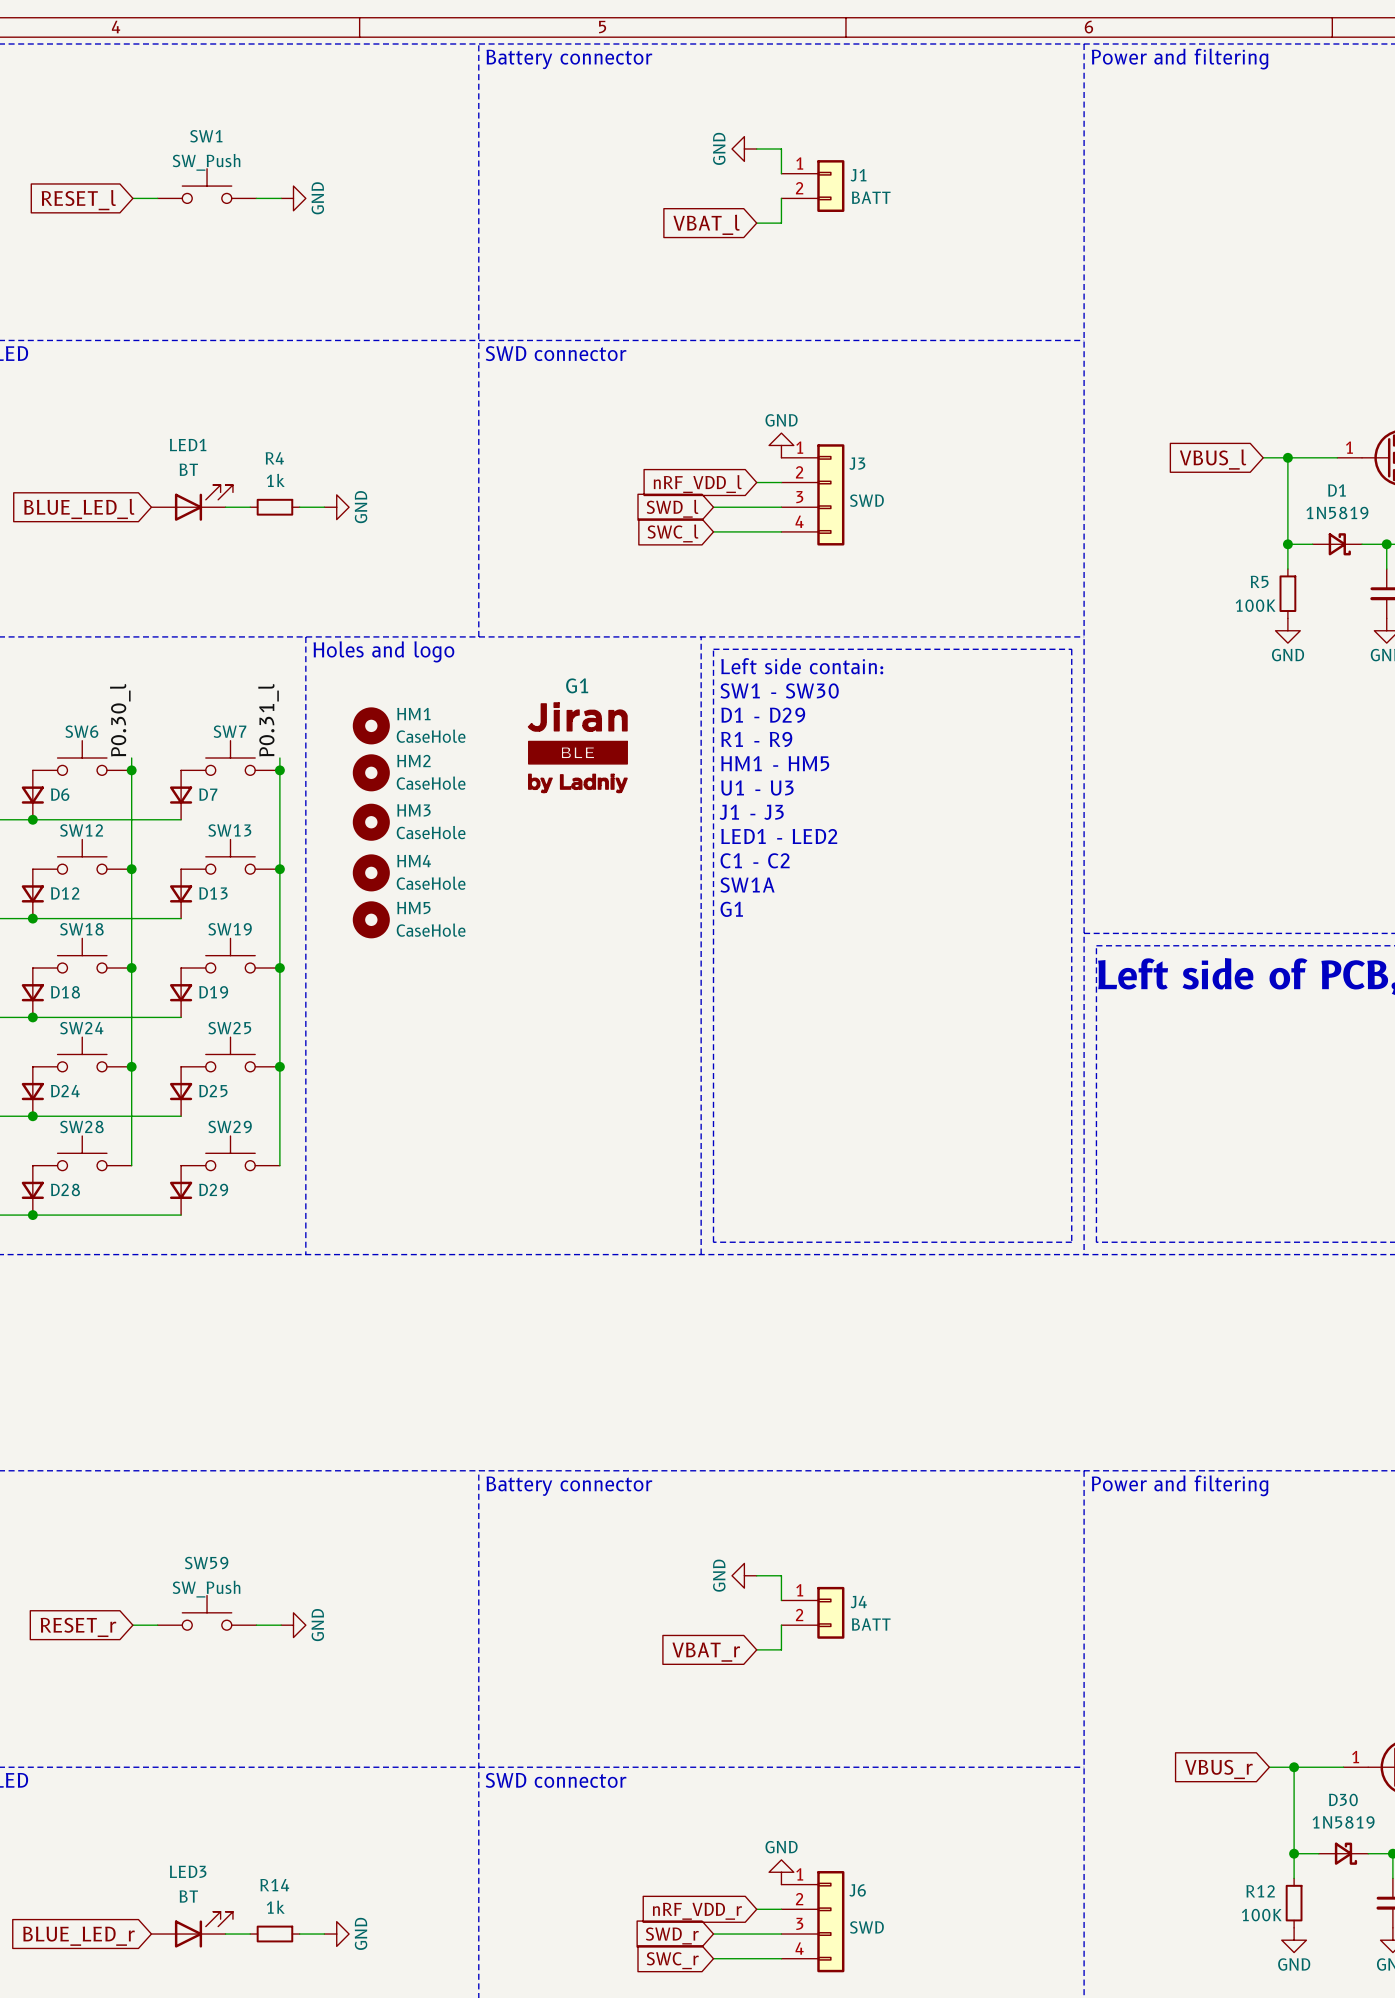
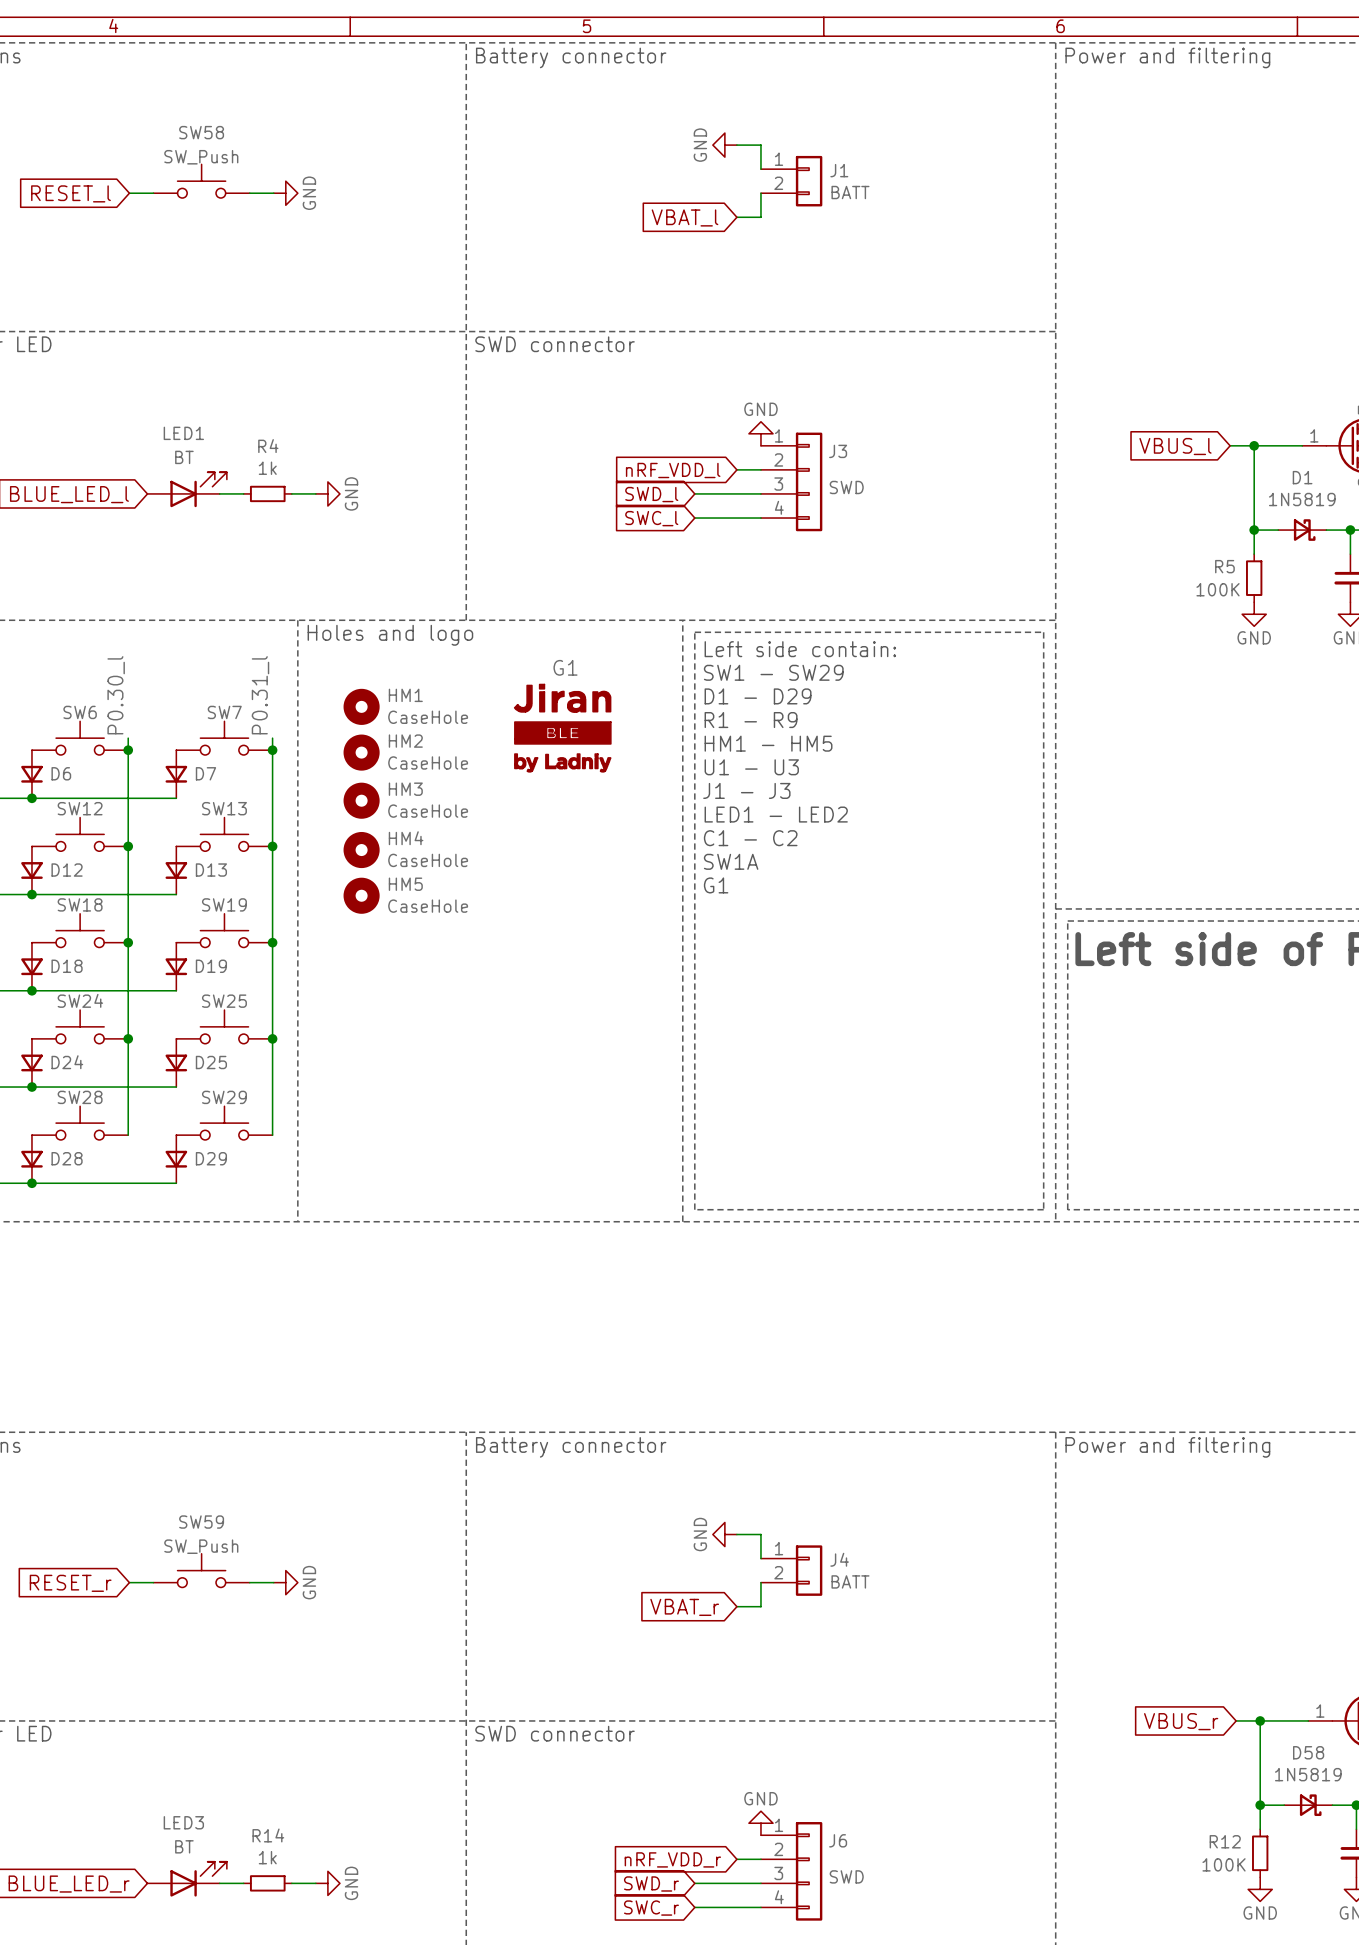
SW1 name: SW1 (206, 136) -> SW58 (201, 132)
text: SW1 - SW30 (779, 690) -> SW1 - SW29 (773, 672)
D30 name: D30 (1343, 1799) -> D58 (1308, 1752)

